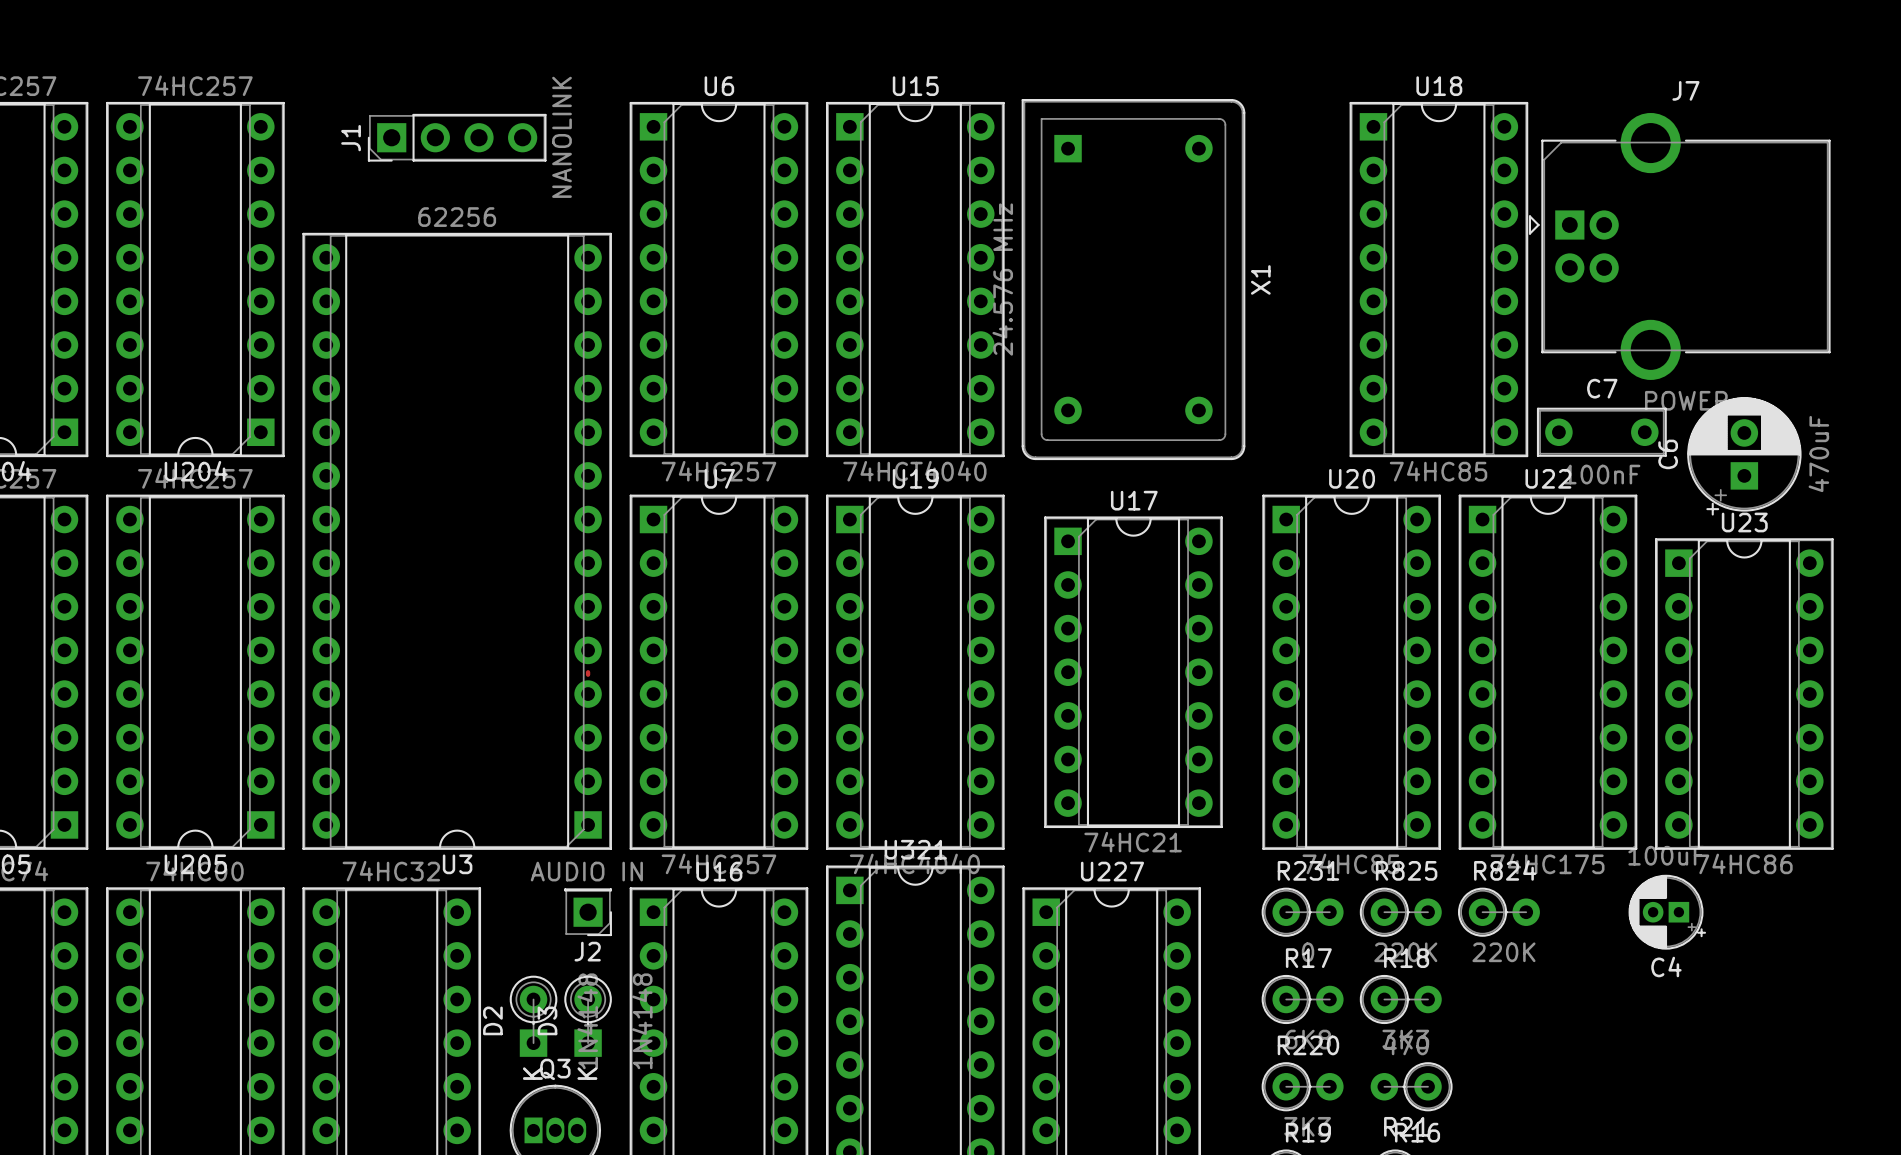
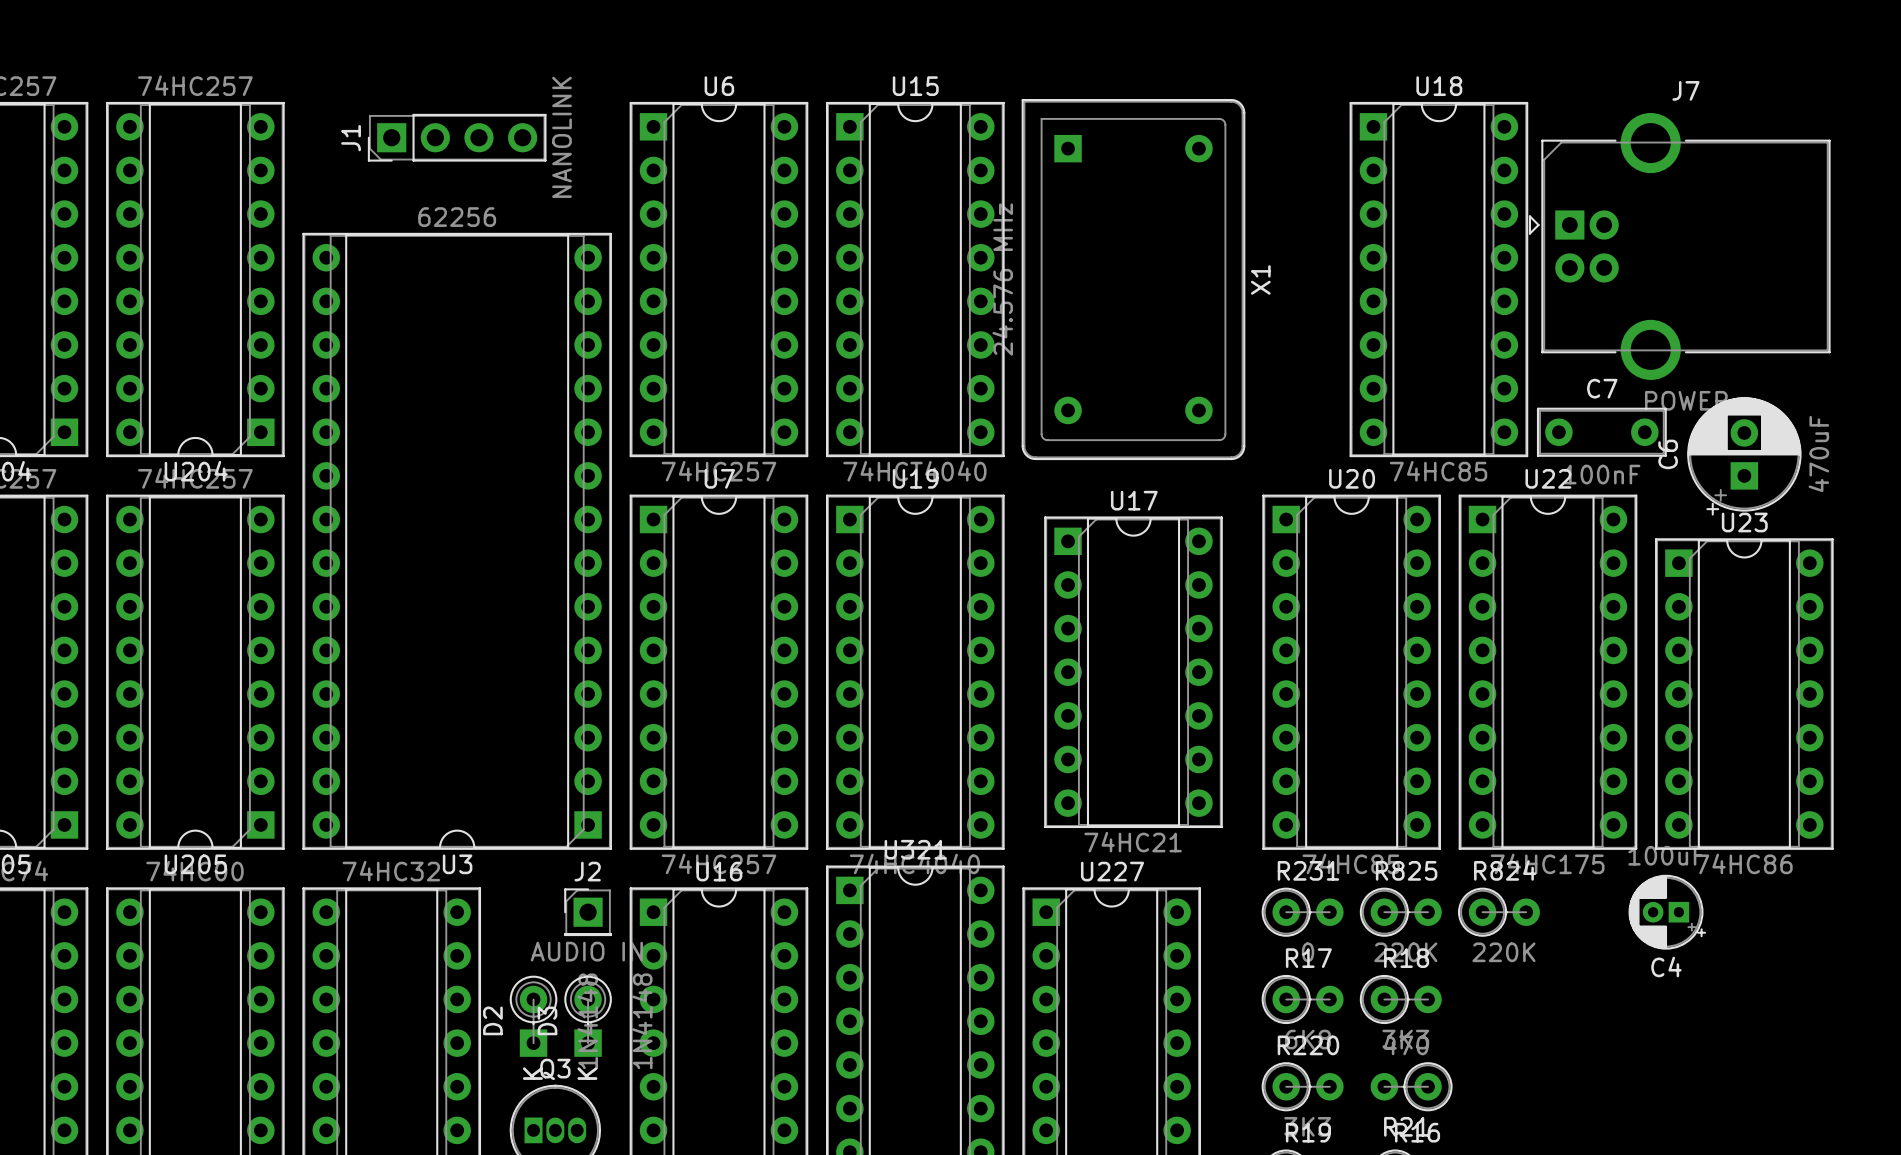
top track: (588, 672) (588, 674) -> none
J2 rotation: 0° (588, 912) -> 180° (588, 912)

